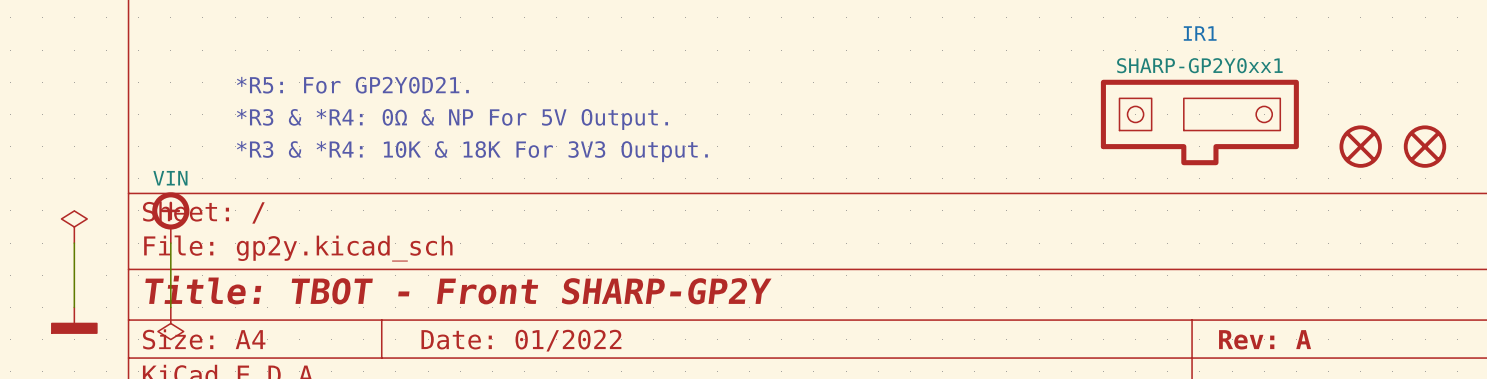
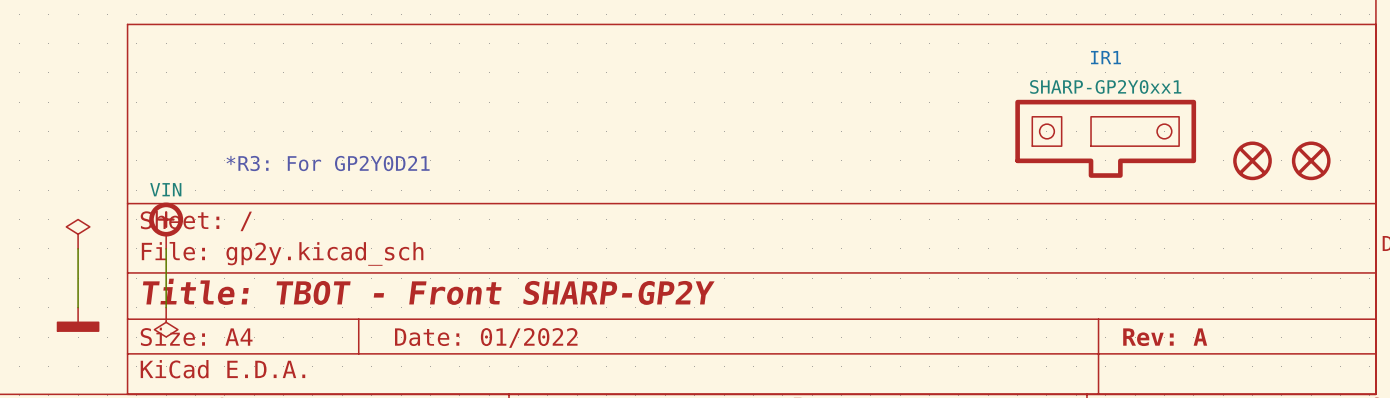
text: *R5: For GP2Y0D21. (352, 85) -> none
text: *R3 & *R4: 0Ω & NP For 5V Output. (452, 119) -> none
text: *R3 & *R4: 10K & 18K For 3V3 Output. (472, 151) -> *R3: For GP2Y0D21 (328, 163)

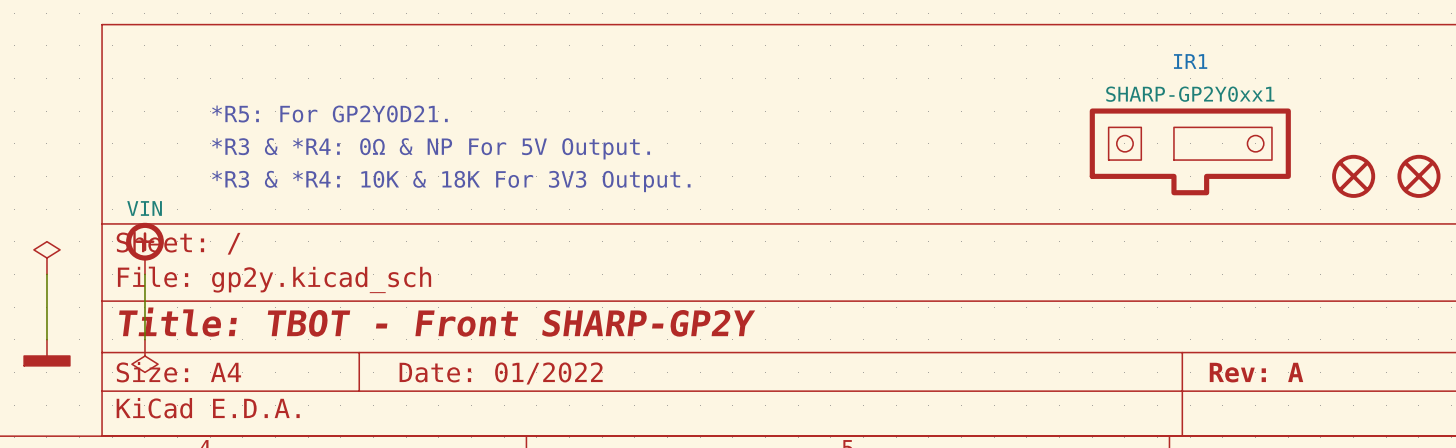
text: none -> *R5: For GP2Y0D21. (329, 114)
text: none -> *R3 & *R4: 0Ω & NP For 5V Output. (431, 148)
text: *R3: For GP2Y0D21 (328, 163) -> *R3 & *R4: 10K & 18K For 3V3 Output. (451, 181)

